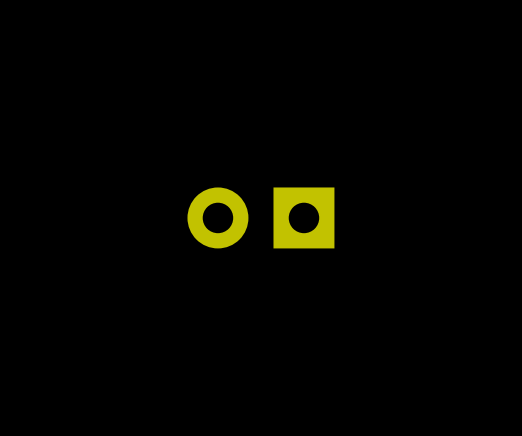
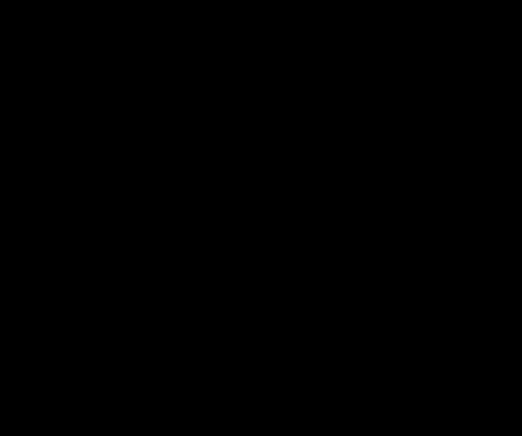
part: (260, 217) -> none

